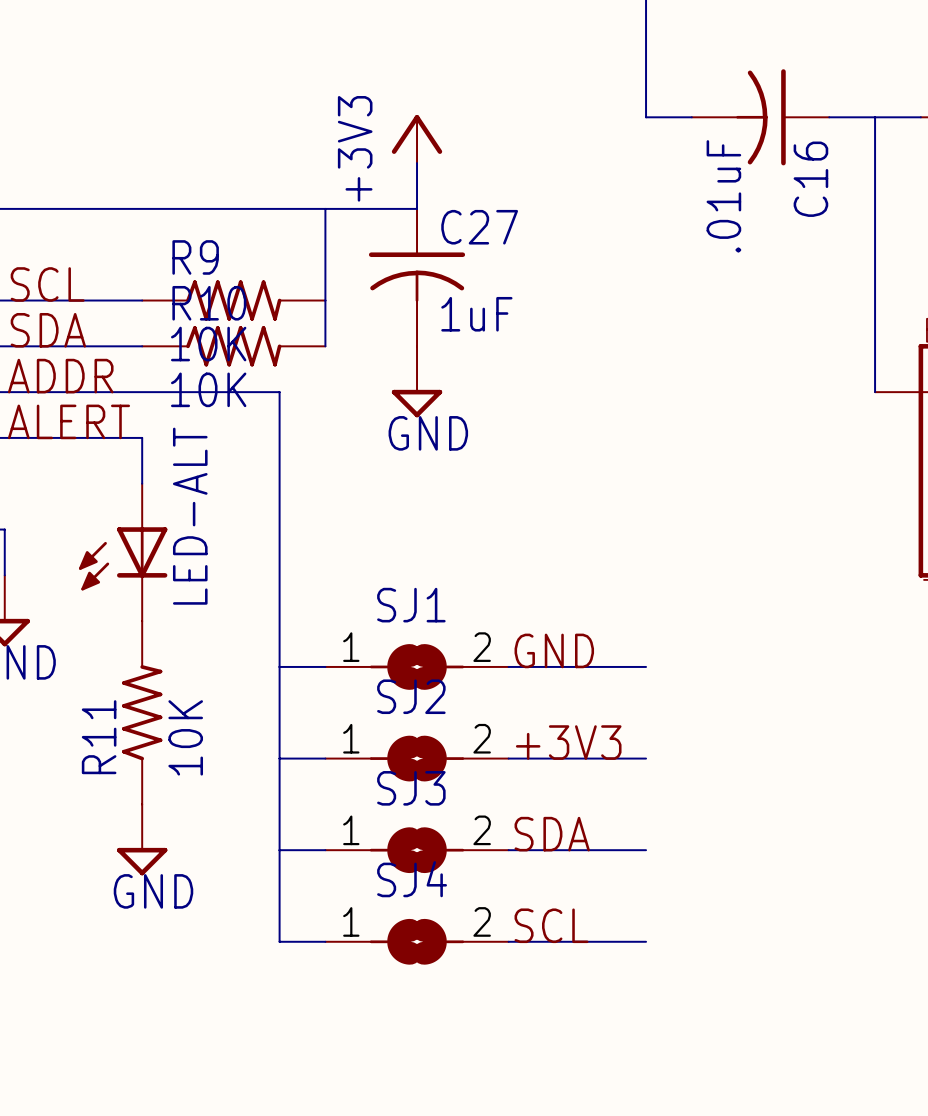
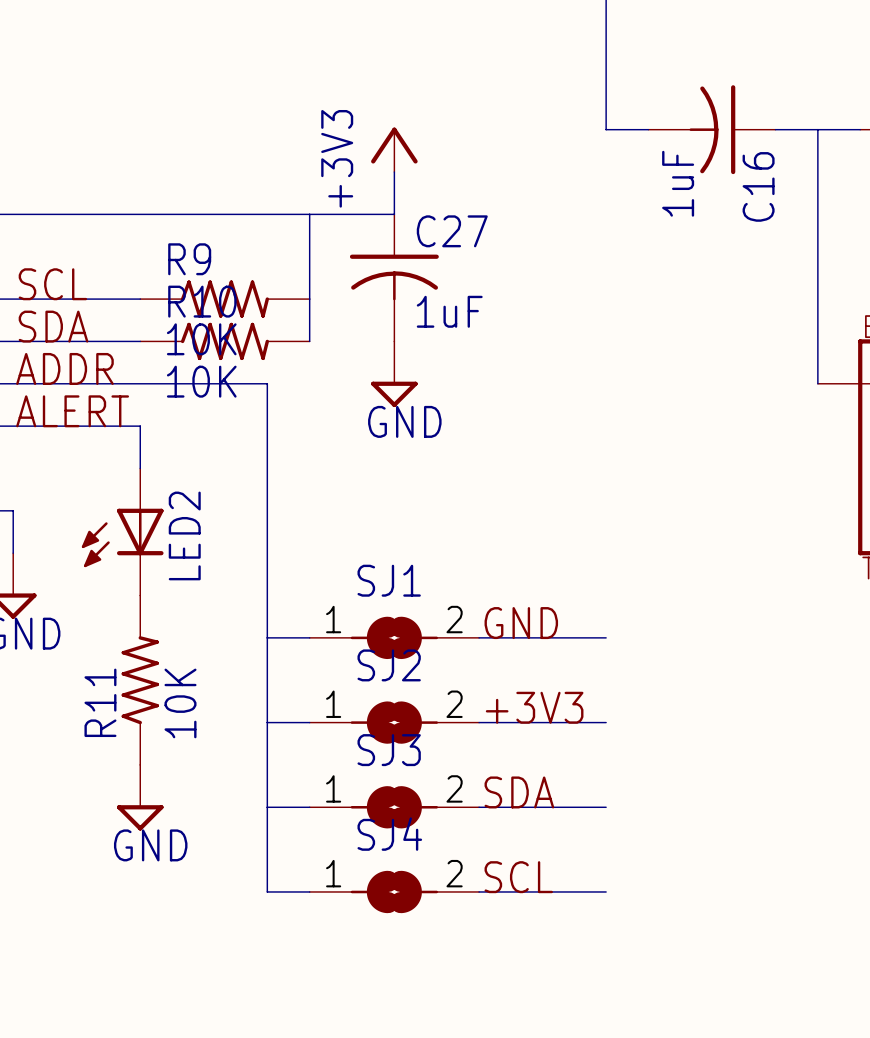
C16 value: .01uF (723, 196) -> 1uF (678, 183)
LED-ALT name: LED-ALT (190, 516) -> LED2 (184, 535)

